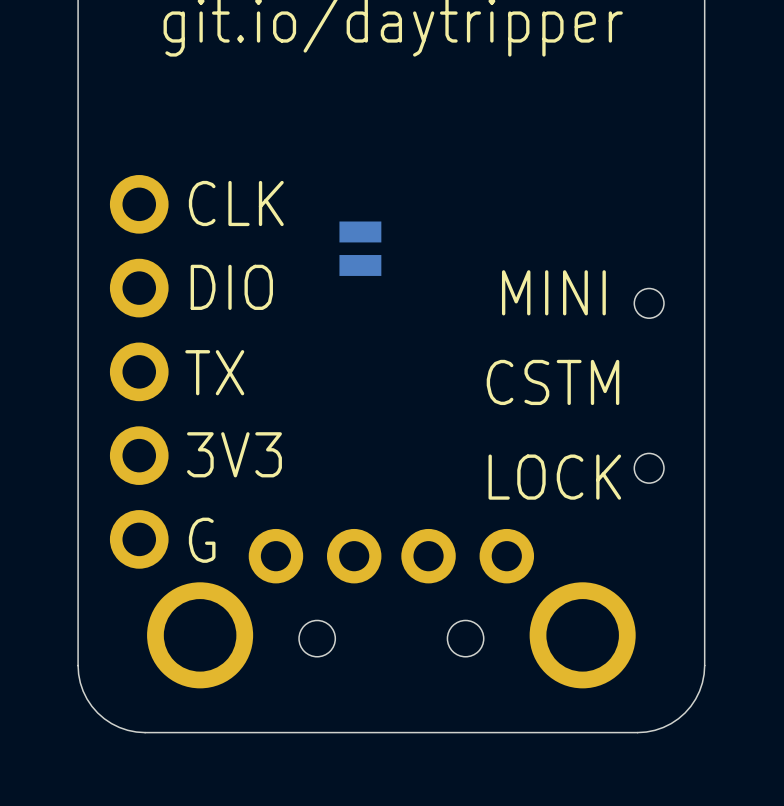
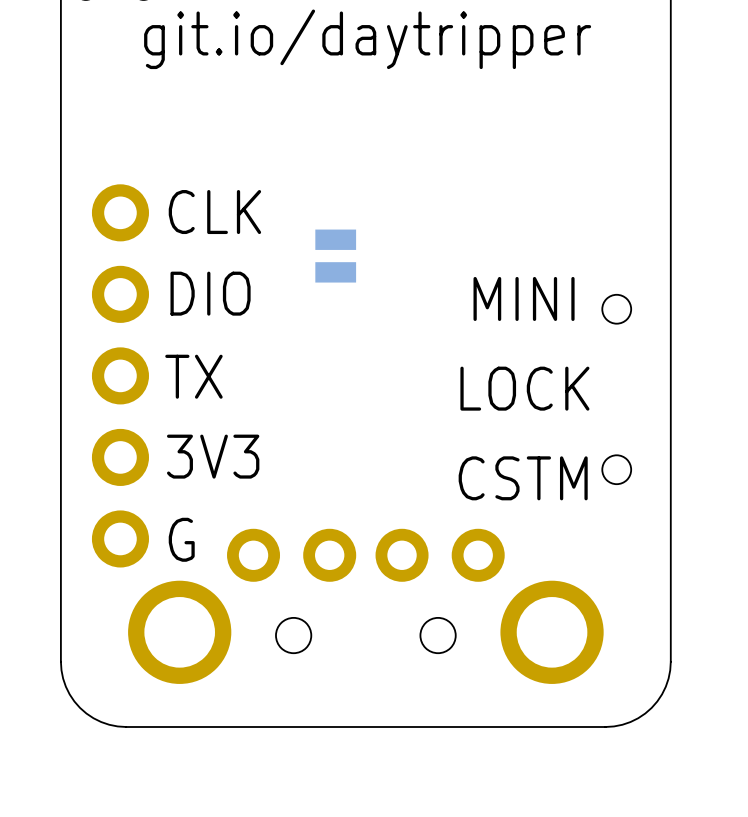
text: CSTM (553, 382) -> LOCK (524, 388)
text: LOCK (554, 477) -> CSTM (523, 478)

